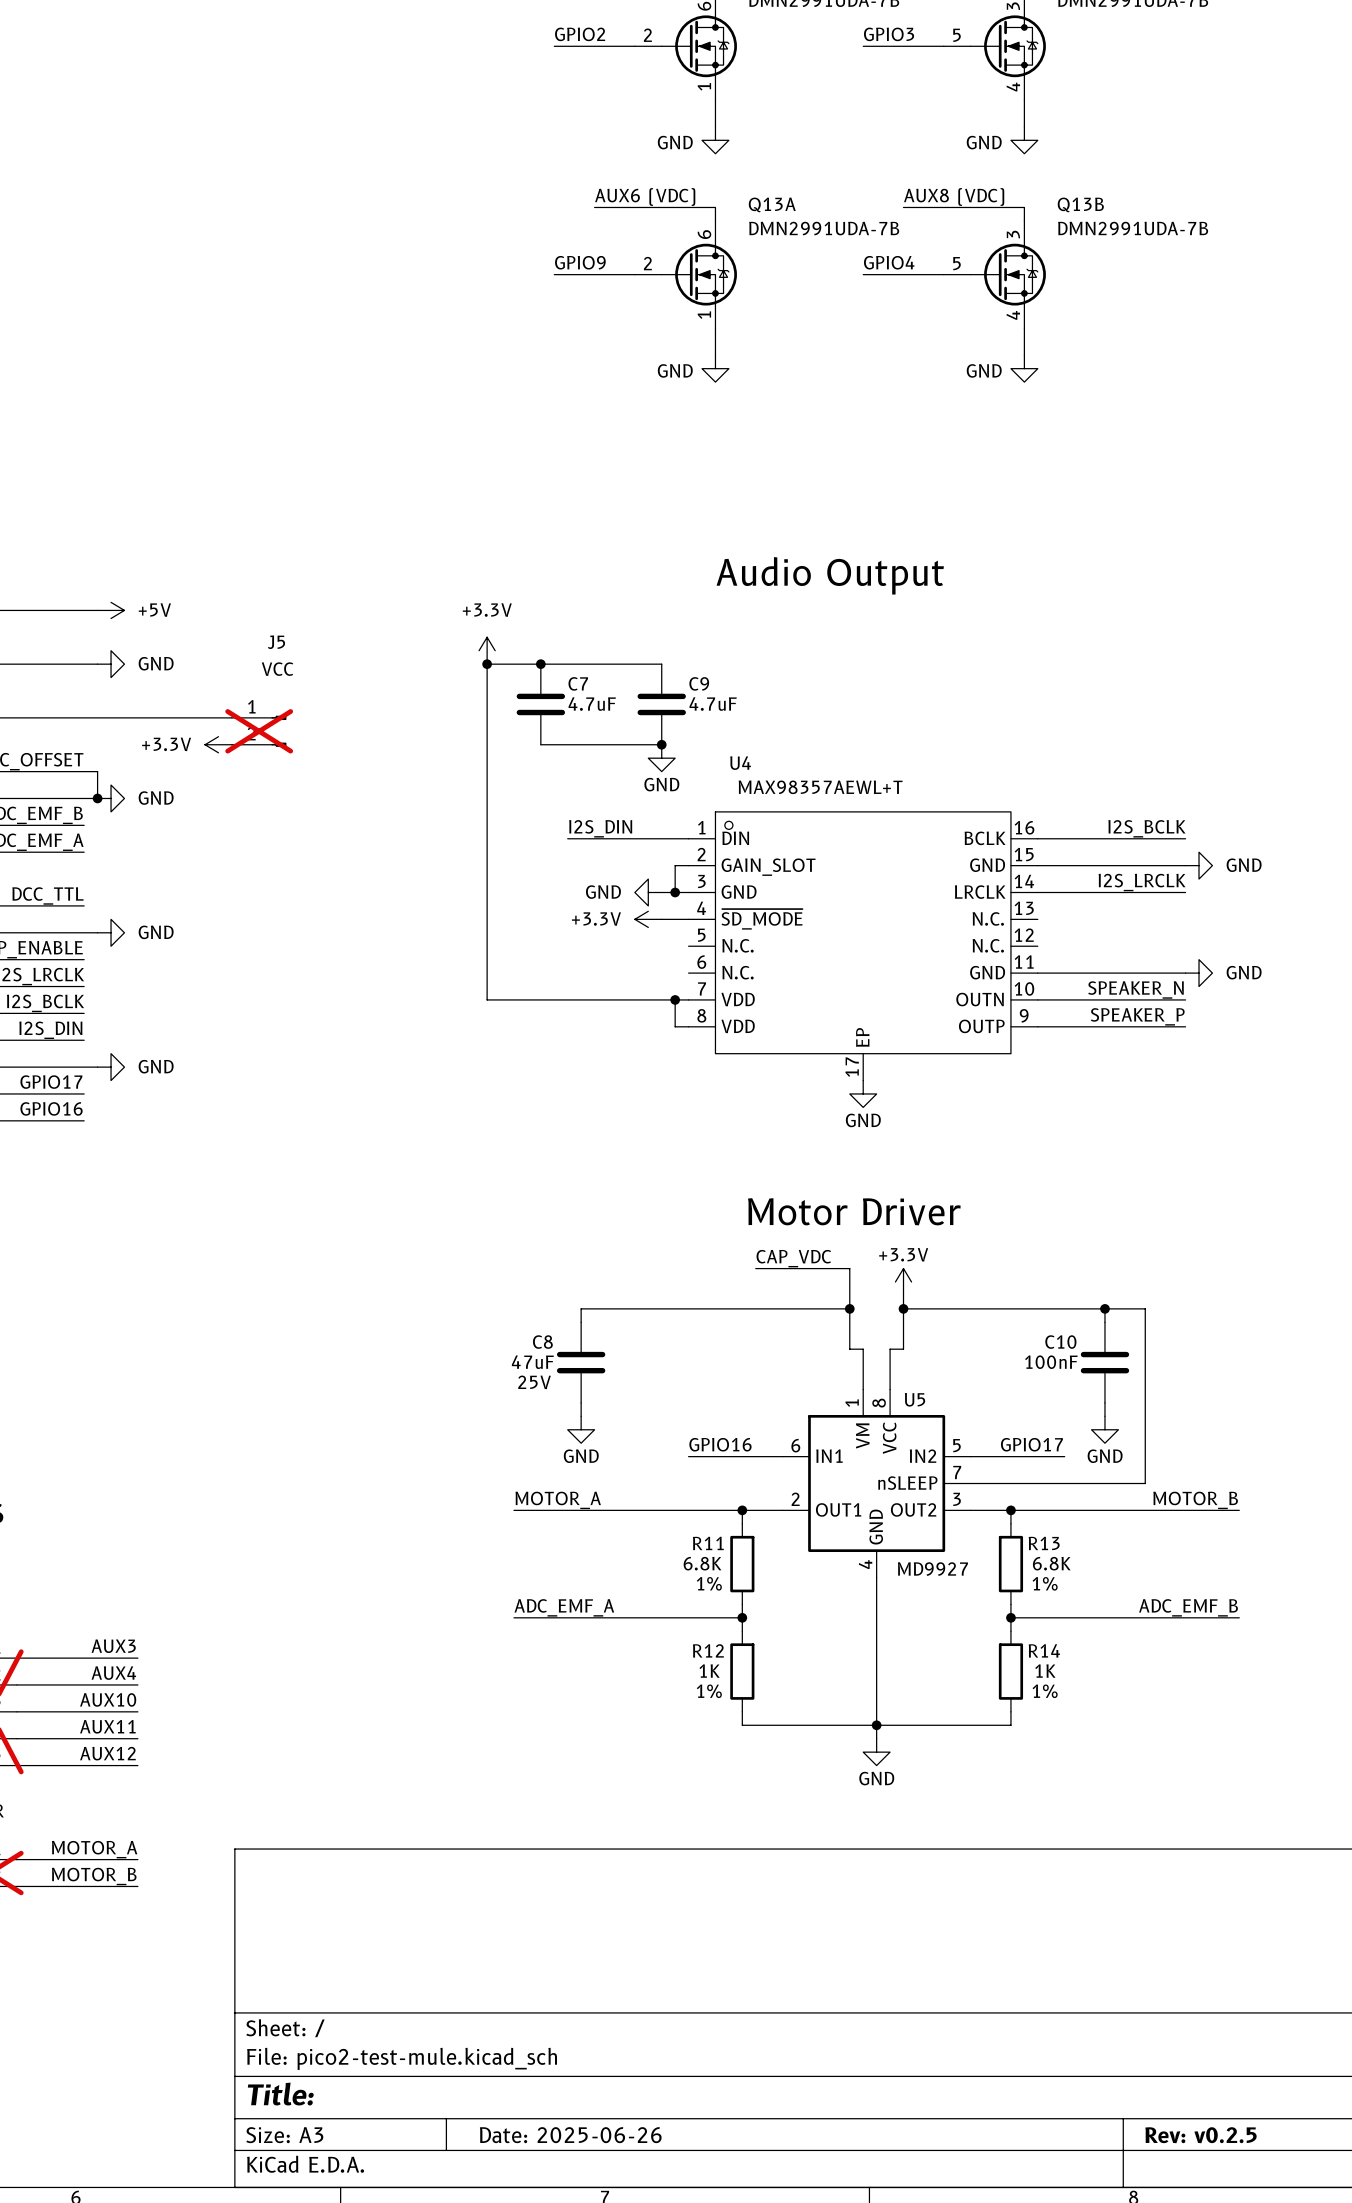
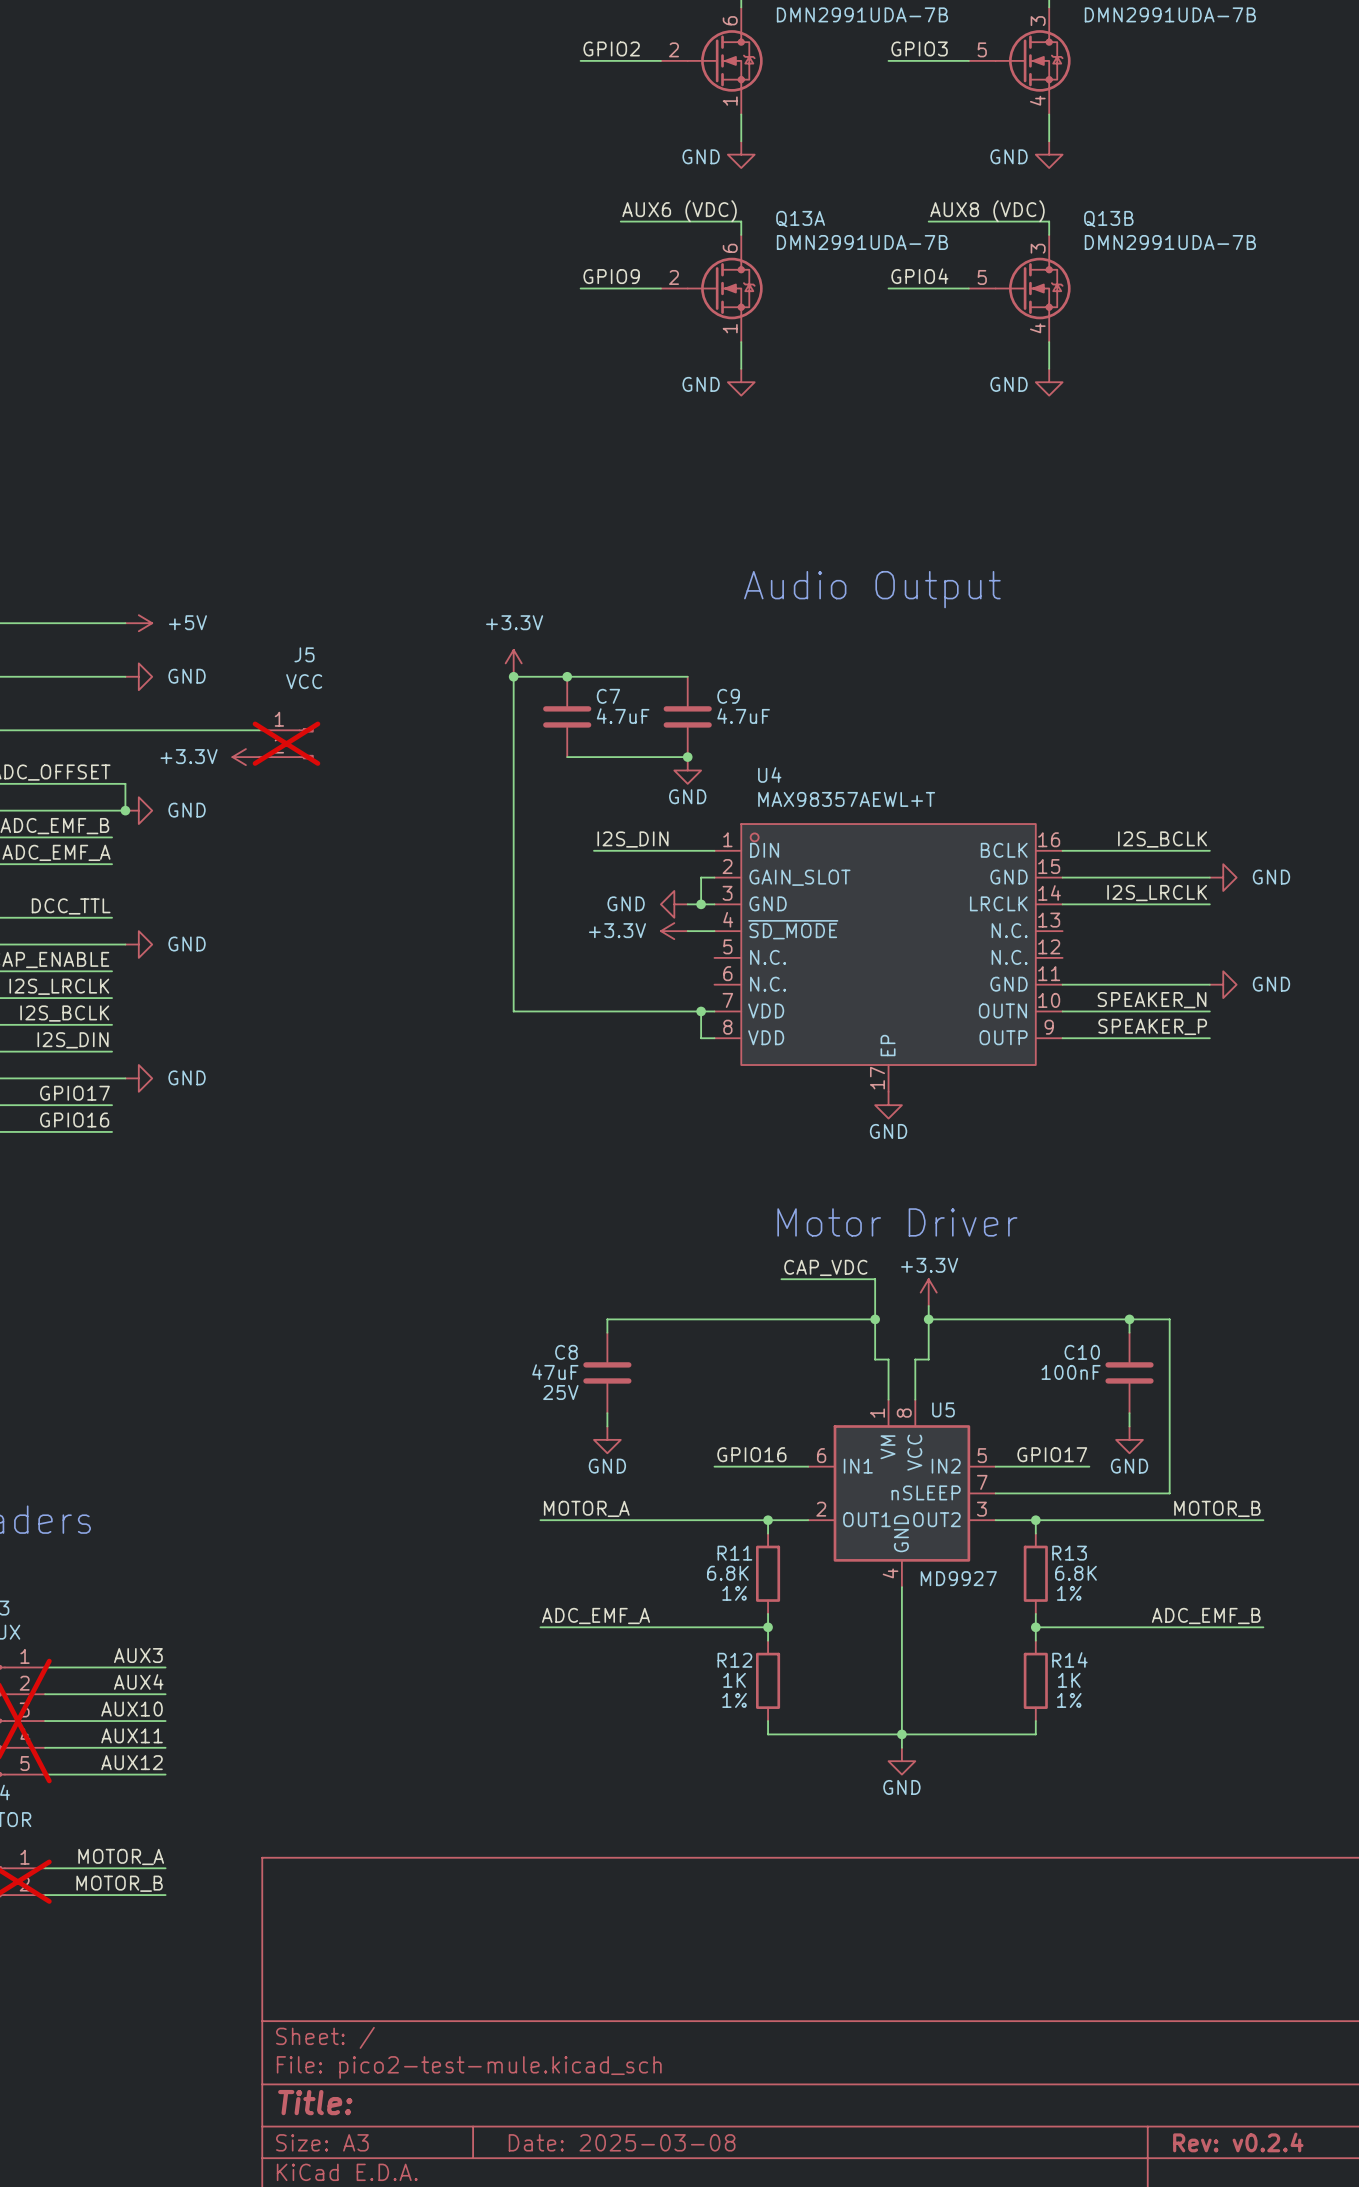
title block: Date: 2025-06-26 (570, 2135) -> Date: 2025-03-08 (622, 2142)
title block: Rev: v0.2.5 (1200, 2135) -> Rev: v0.2.4 (1238, 2142)

